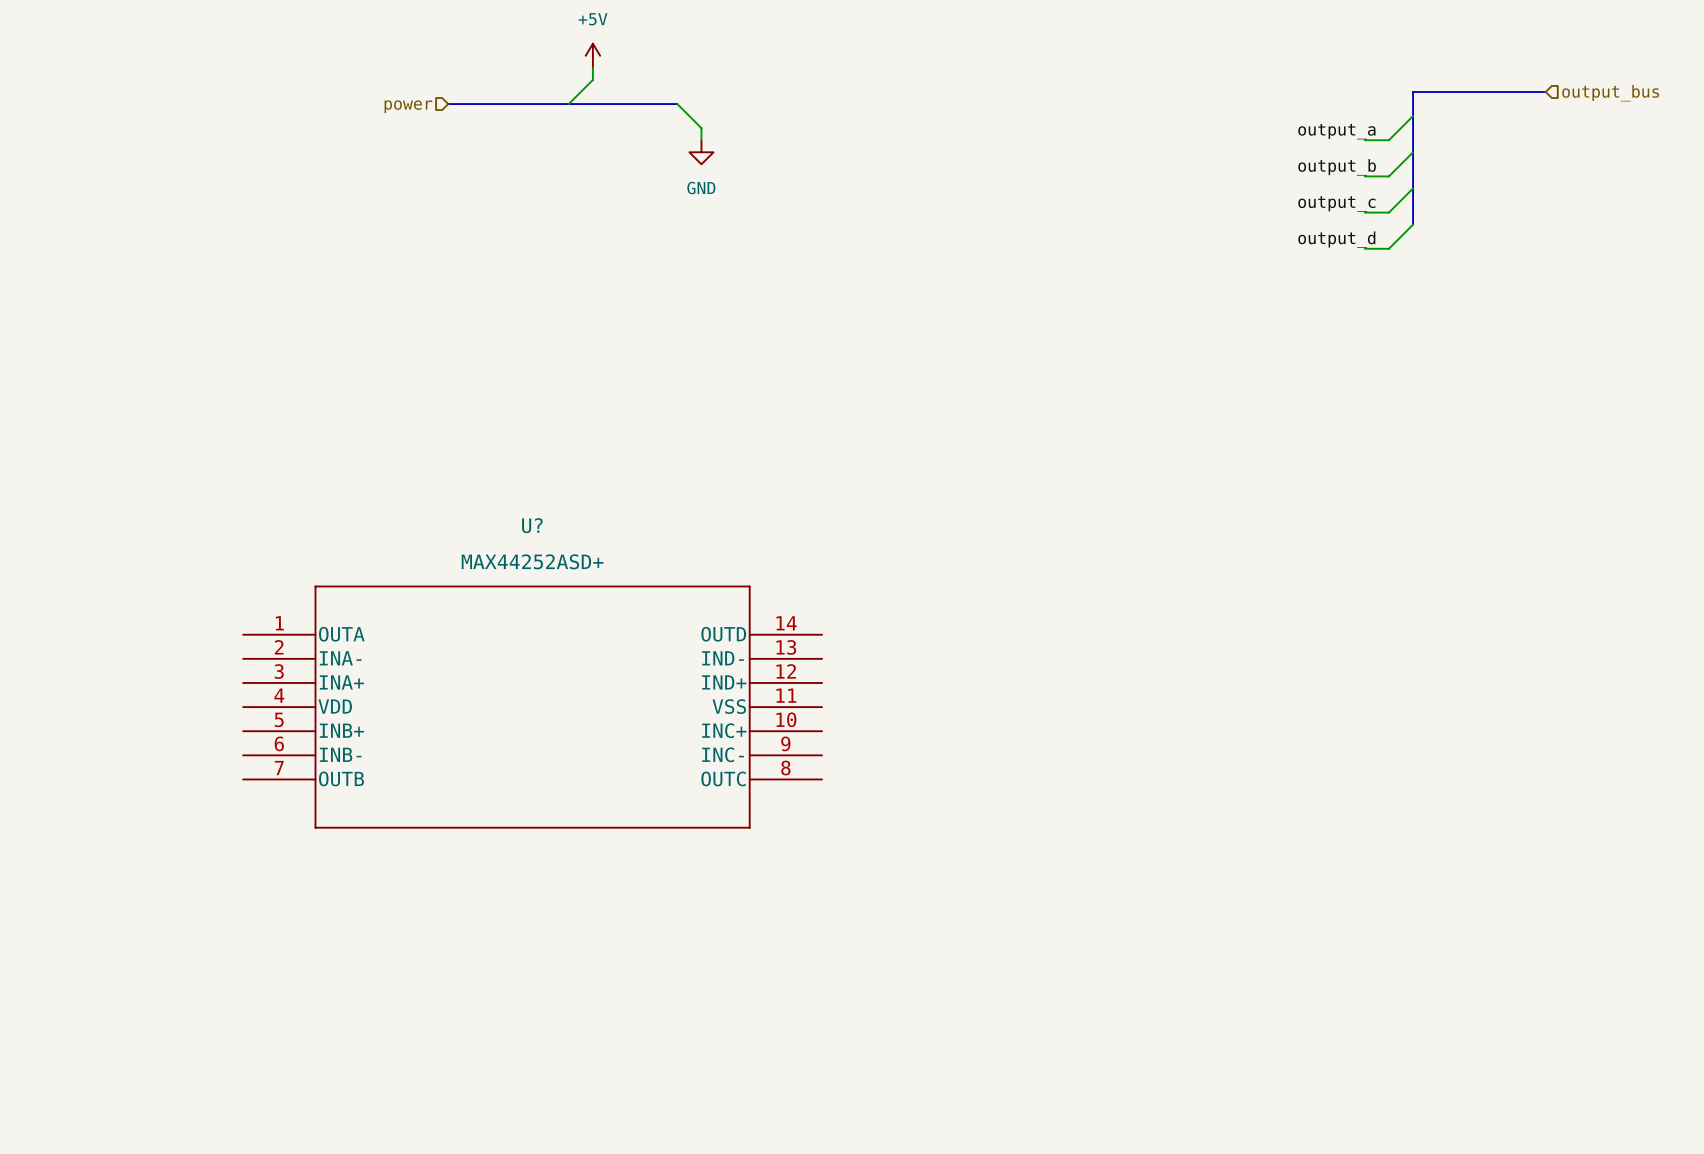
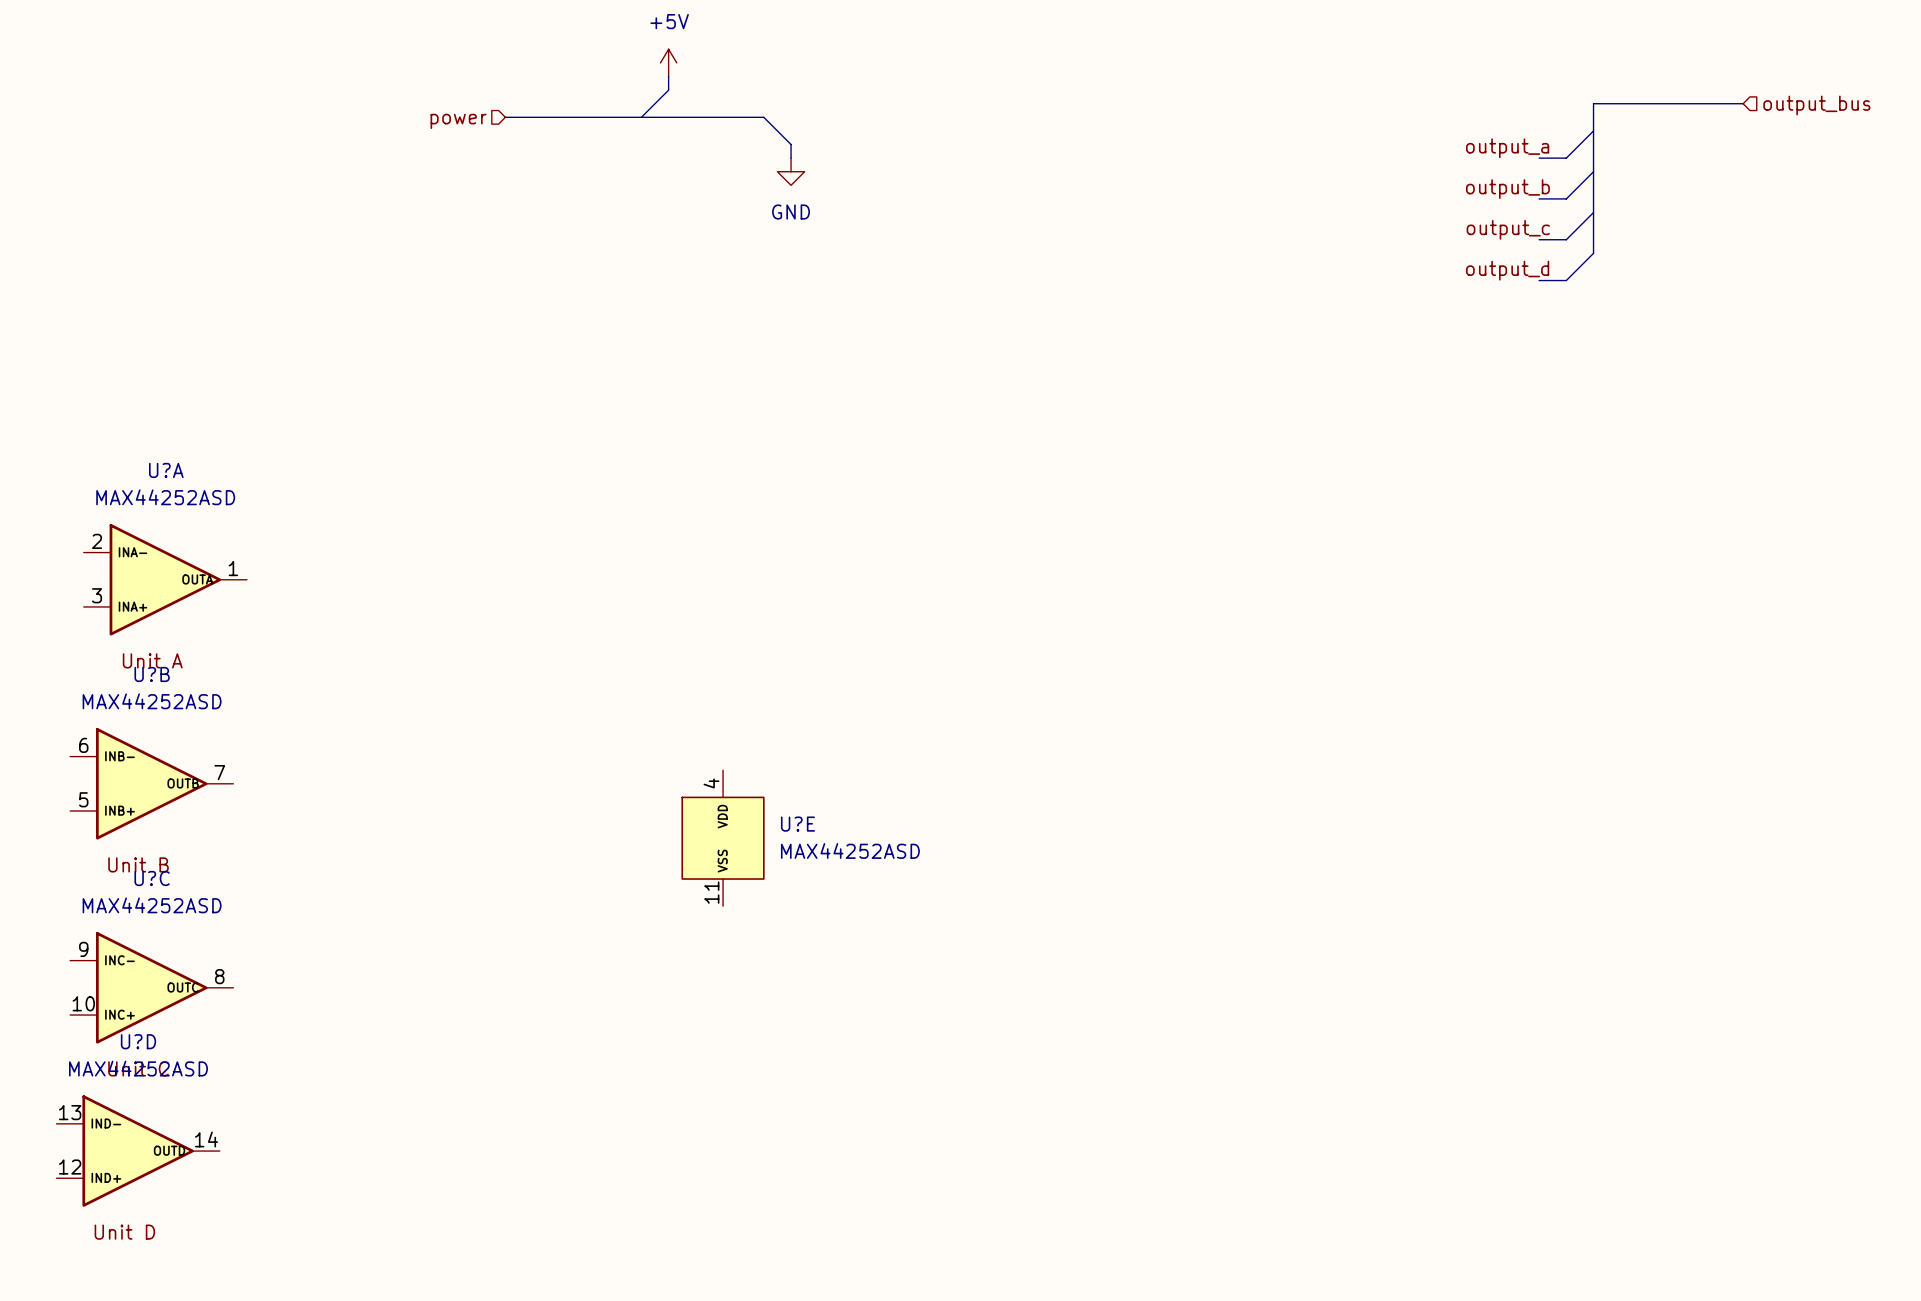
U?A: none -> MAX44252ASD (165, 579)
U?B: none -> MAX44252ASD (151, 783)
U?: MAX44252ASD+ (532, 707) -> none
U?E: none -> MAX44252ASD (723, 838)
U?C: none -> MAX44252ASD (151, 987)
U?D: none -> MAX44252ASD (138, 1151)

